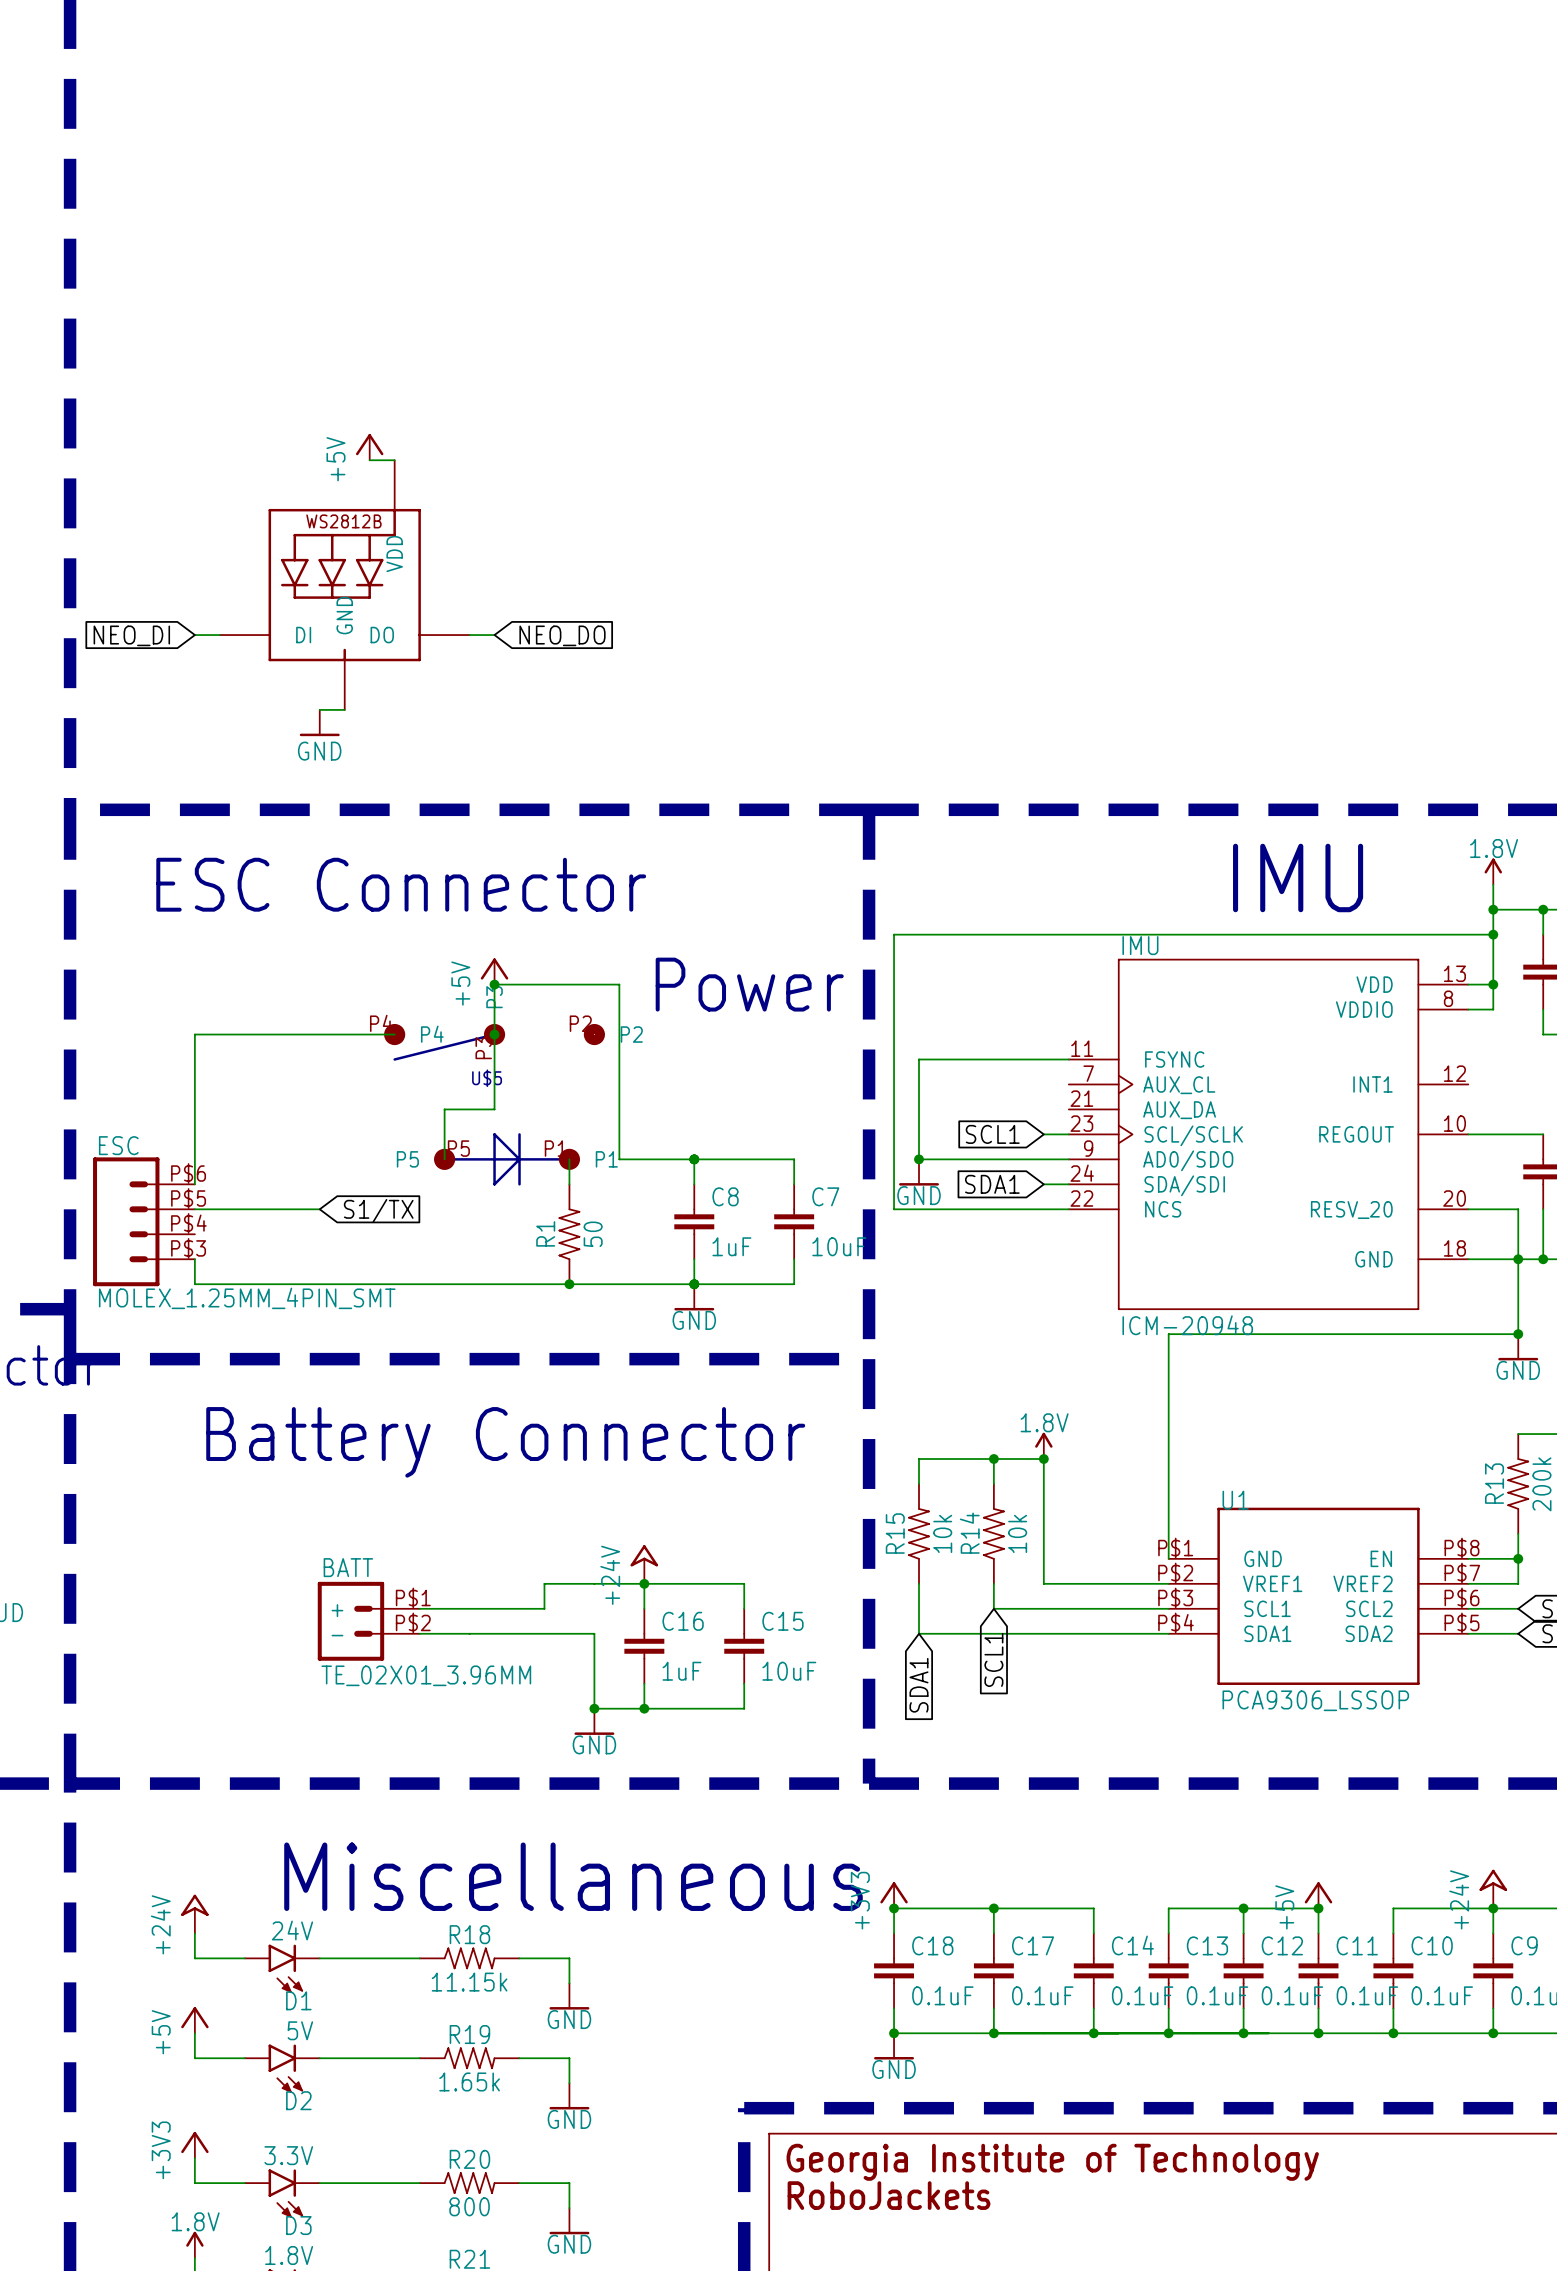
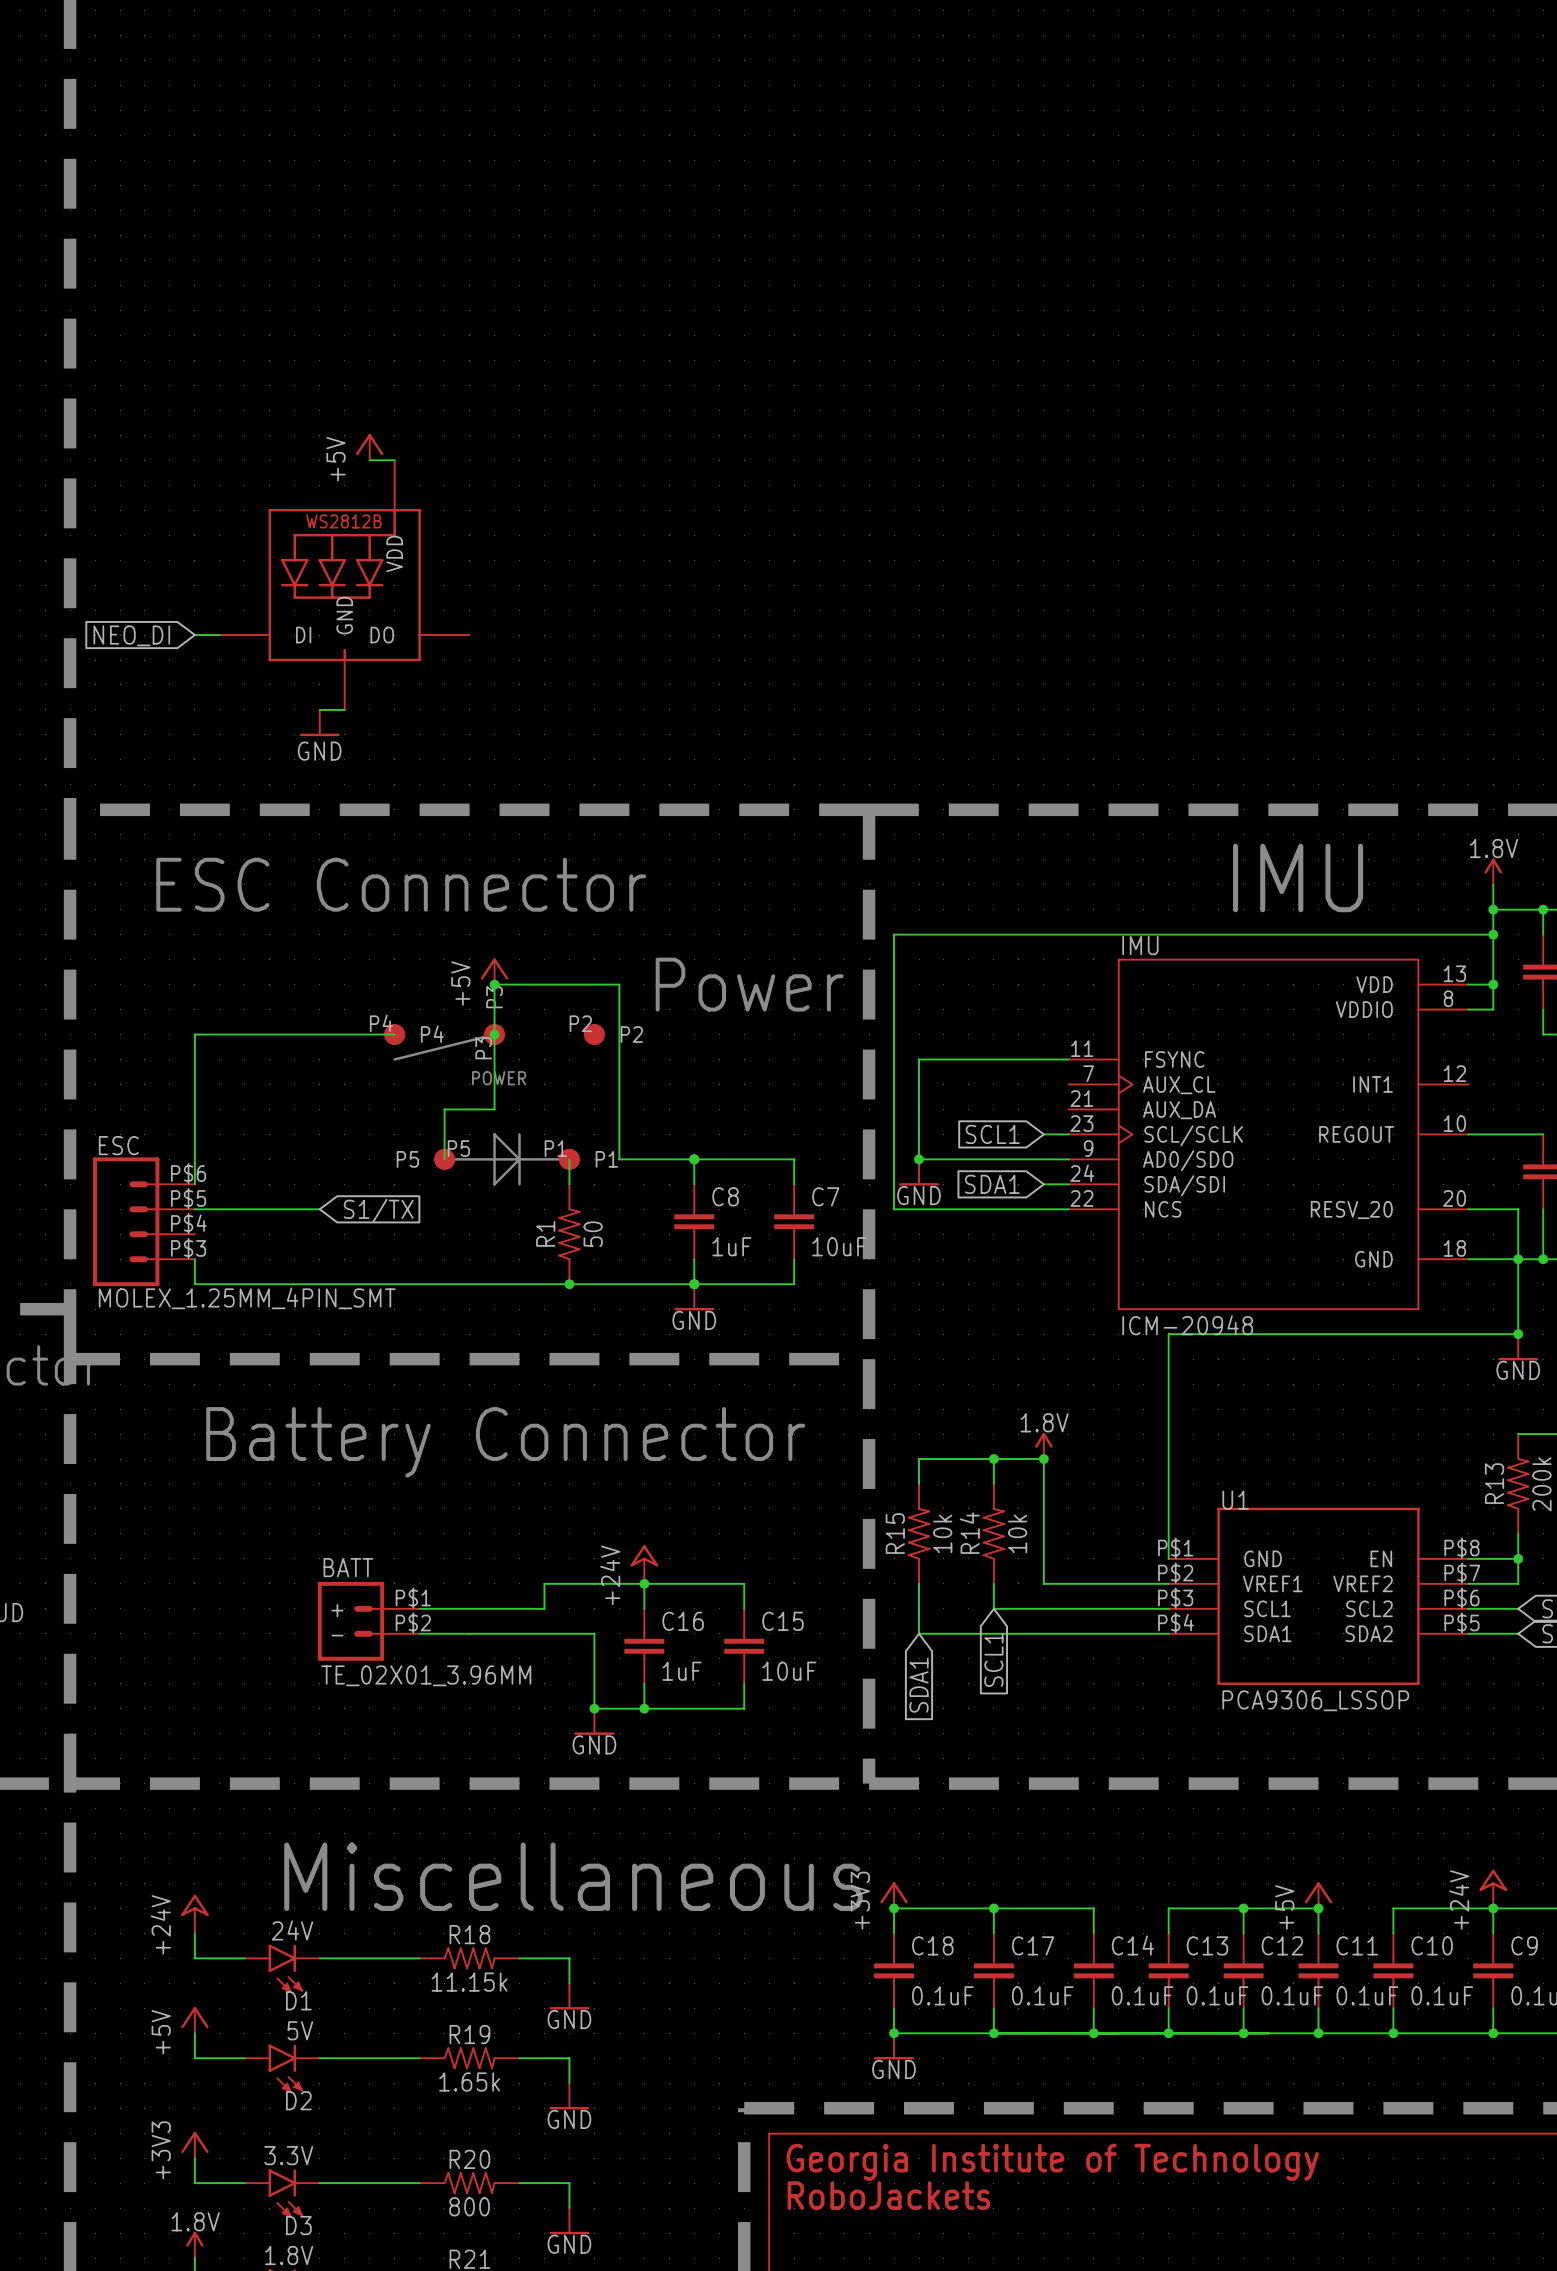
wire: (469, 635) (494, 635) -> none
global label: NEO_DO (562, 635) -> none
U$5 name: U$5 (487, 1078) -> POWER (499, 1078)

